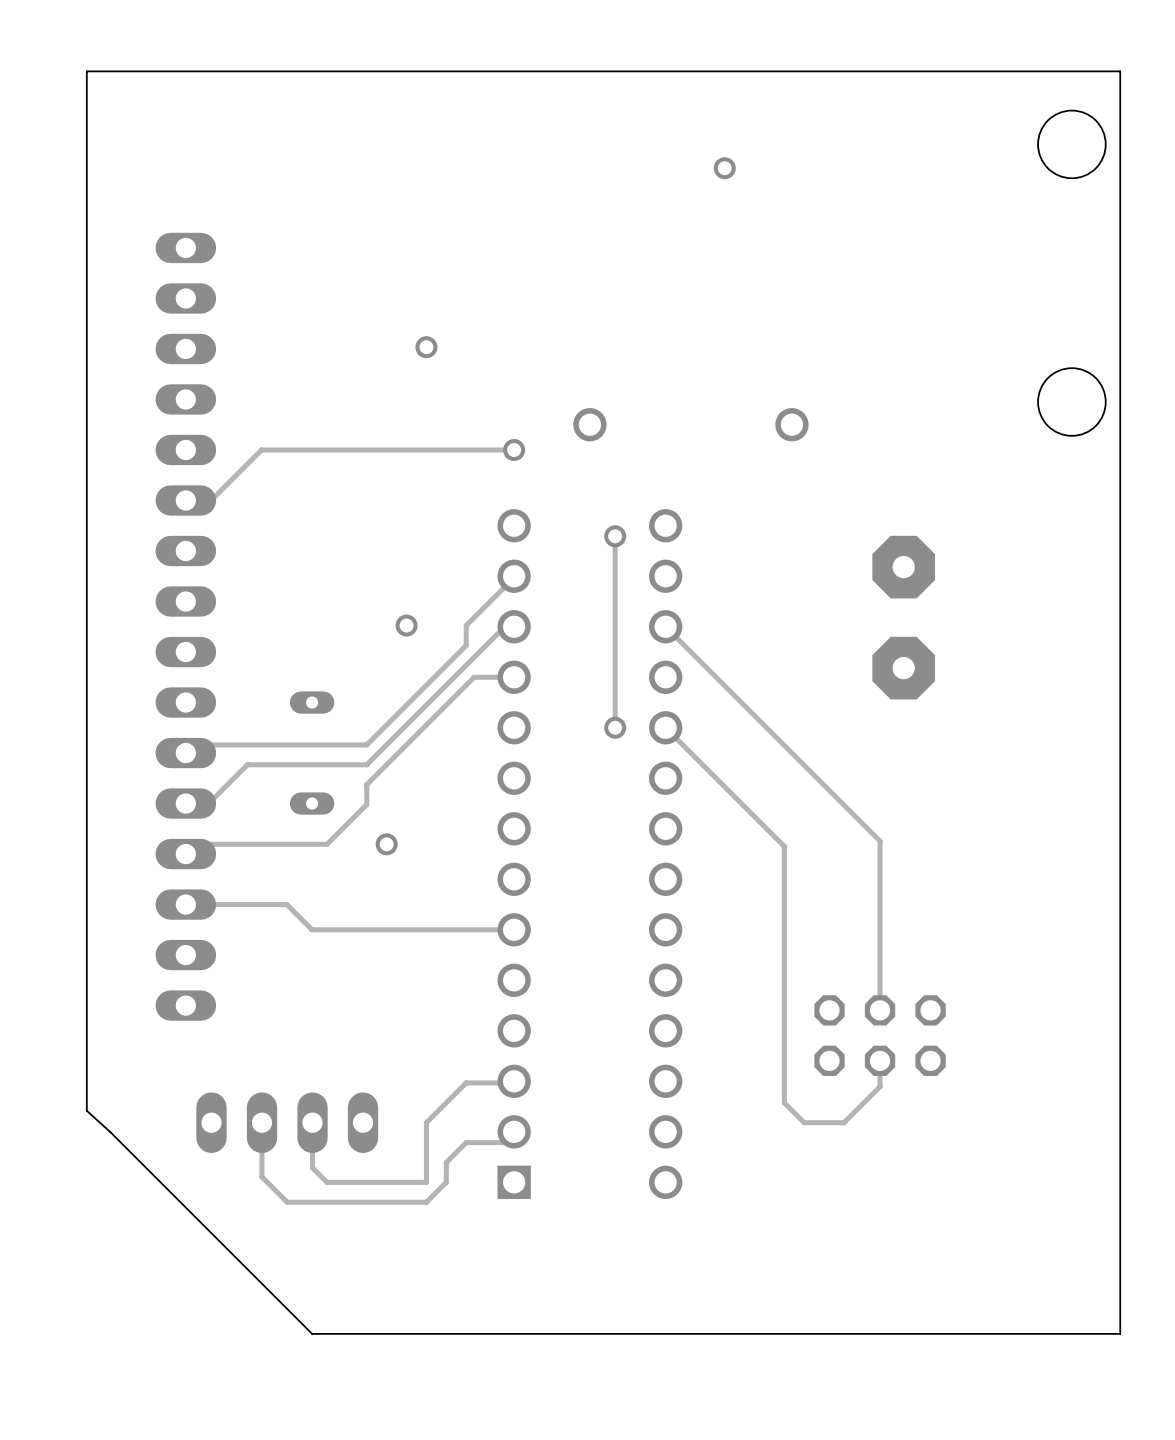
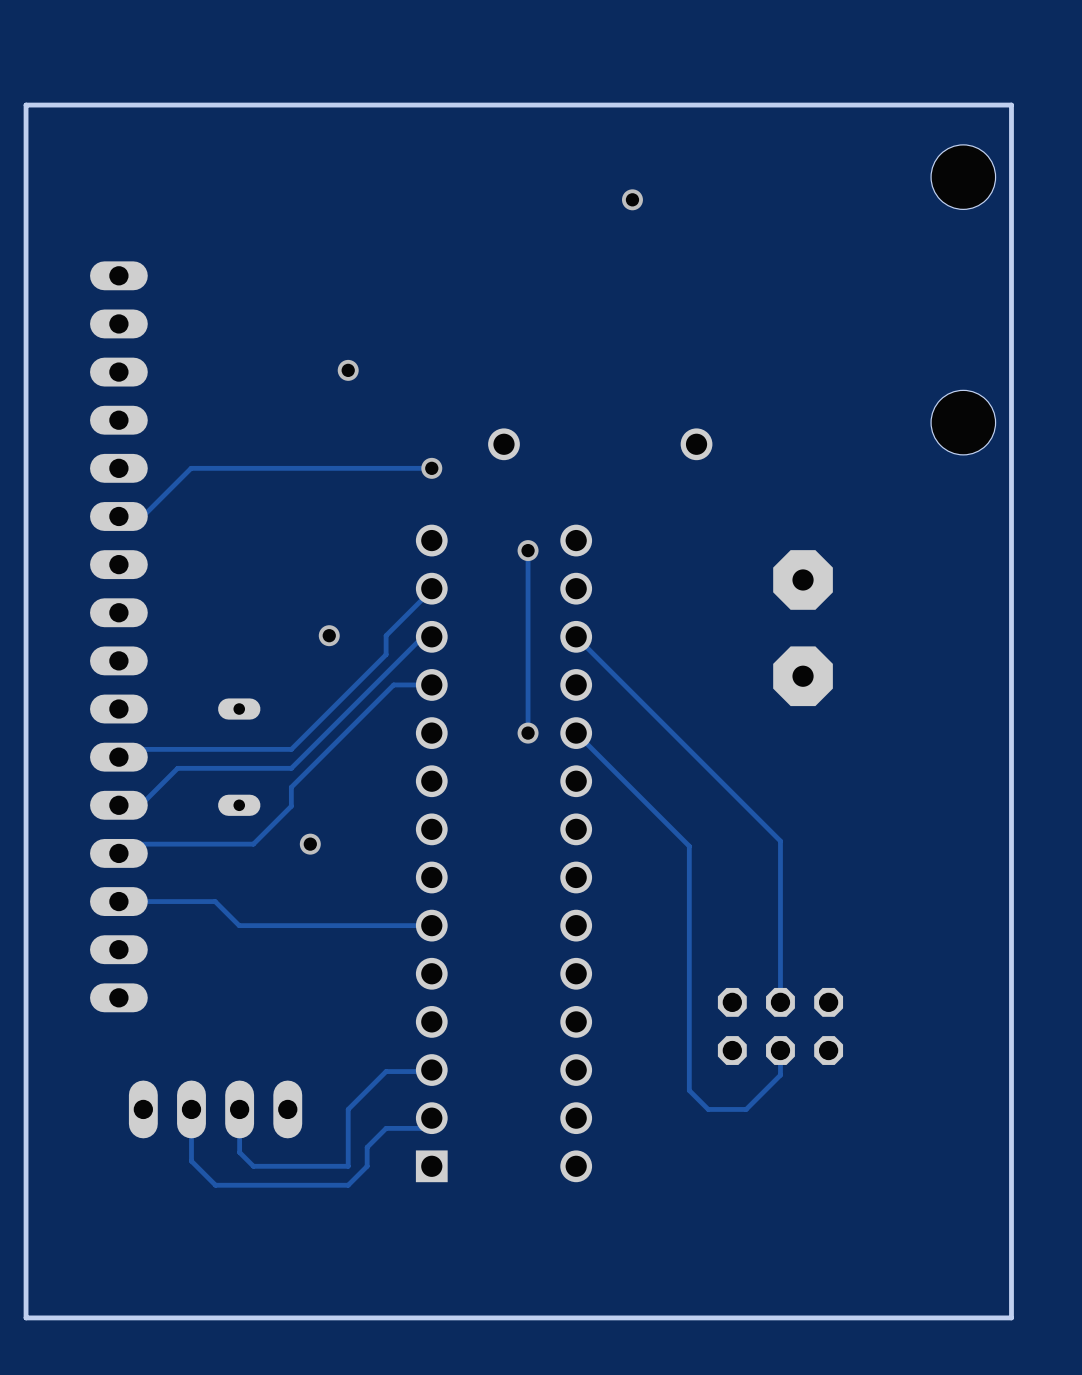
board edge: (1120, 71) (86, 71) (86, 1110) (312, 1333) (1120, 1333) (1120, 71) -> (1011, 105) (1011, 1317) (26, 1317) (26, 105) (1011, 105)

